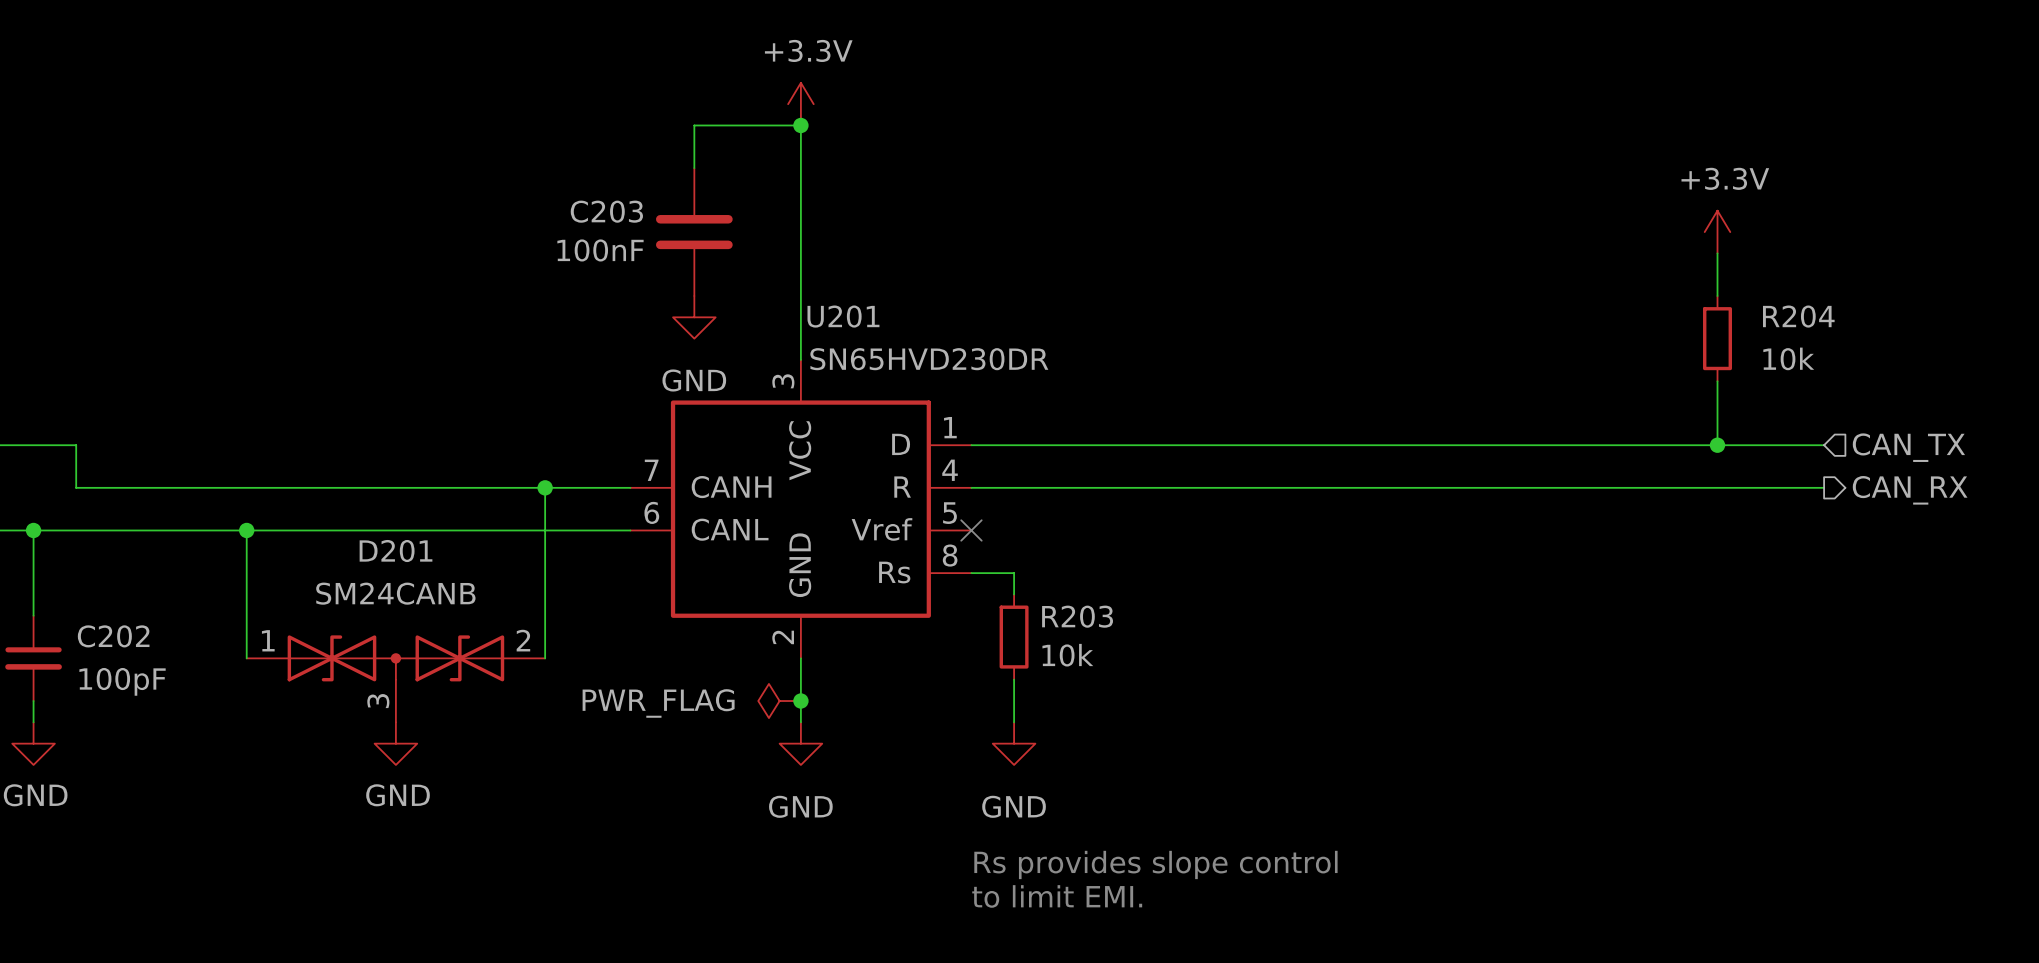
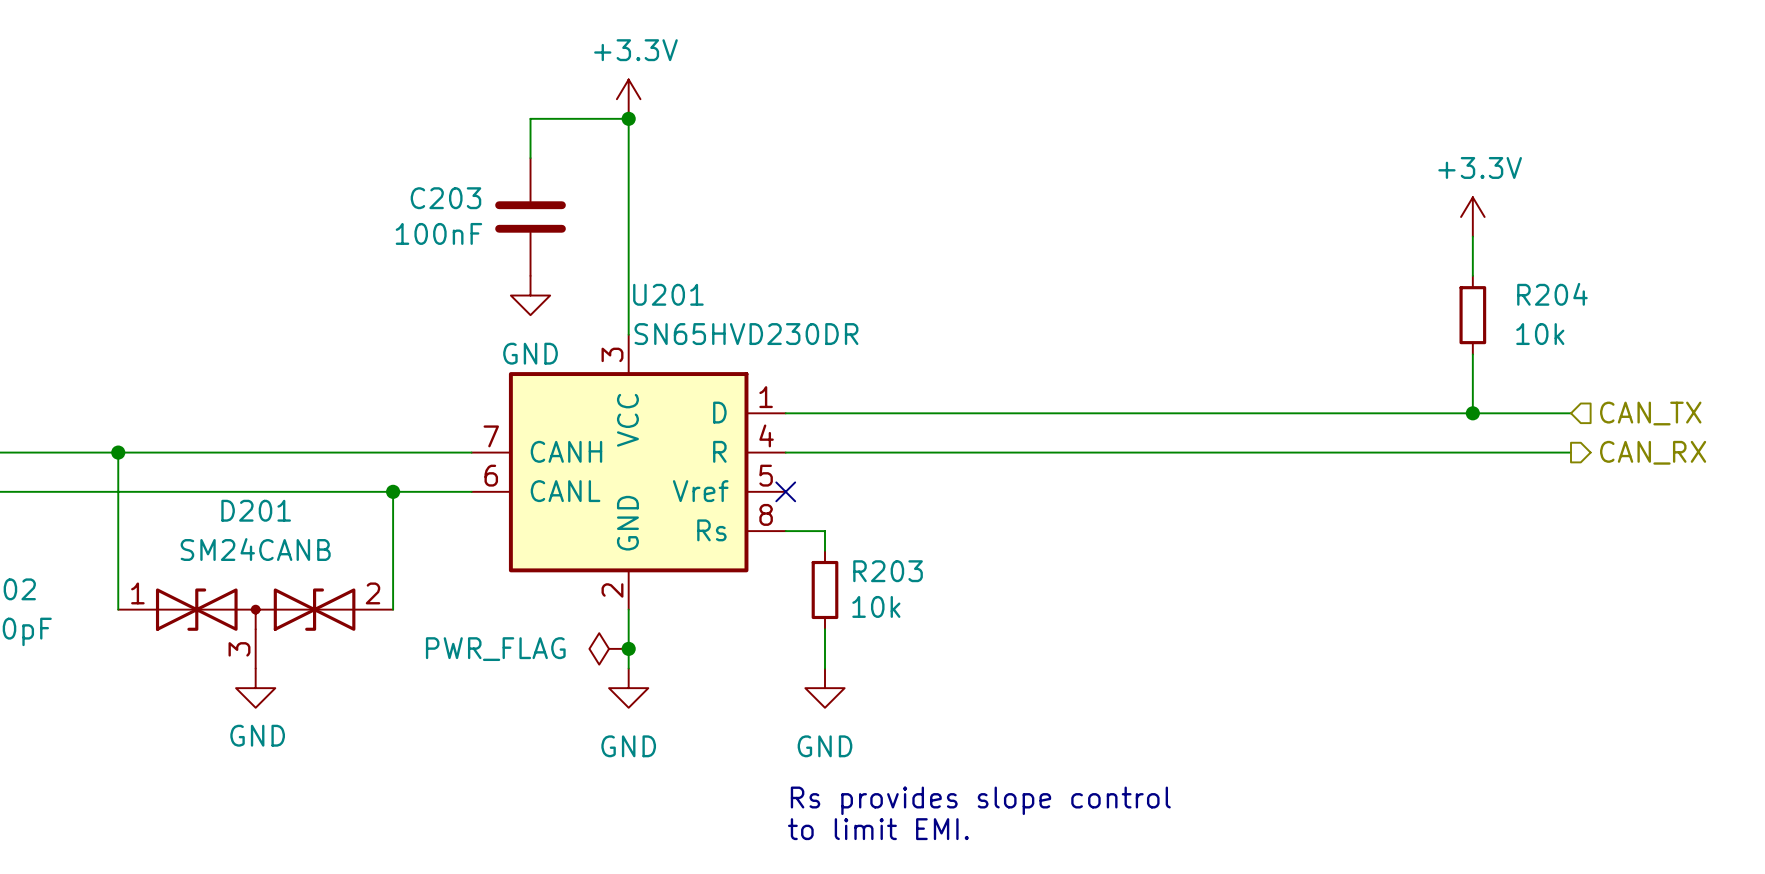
wire: (545, 487) (545, 530) -> (118, 452) (118, 491)
junction position: (545, 487) -> (393, 491)
junction position: (246, 530) -> (118, 452)

